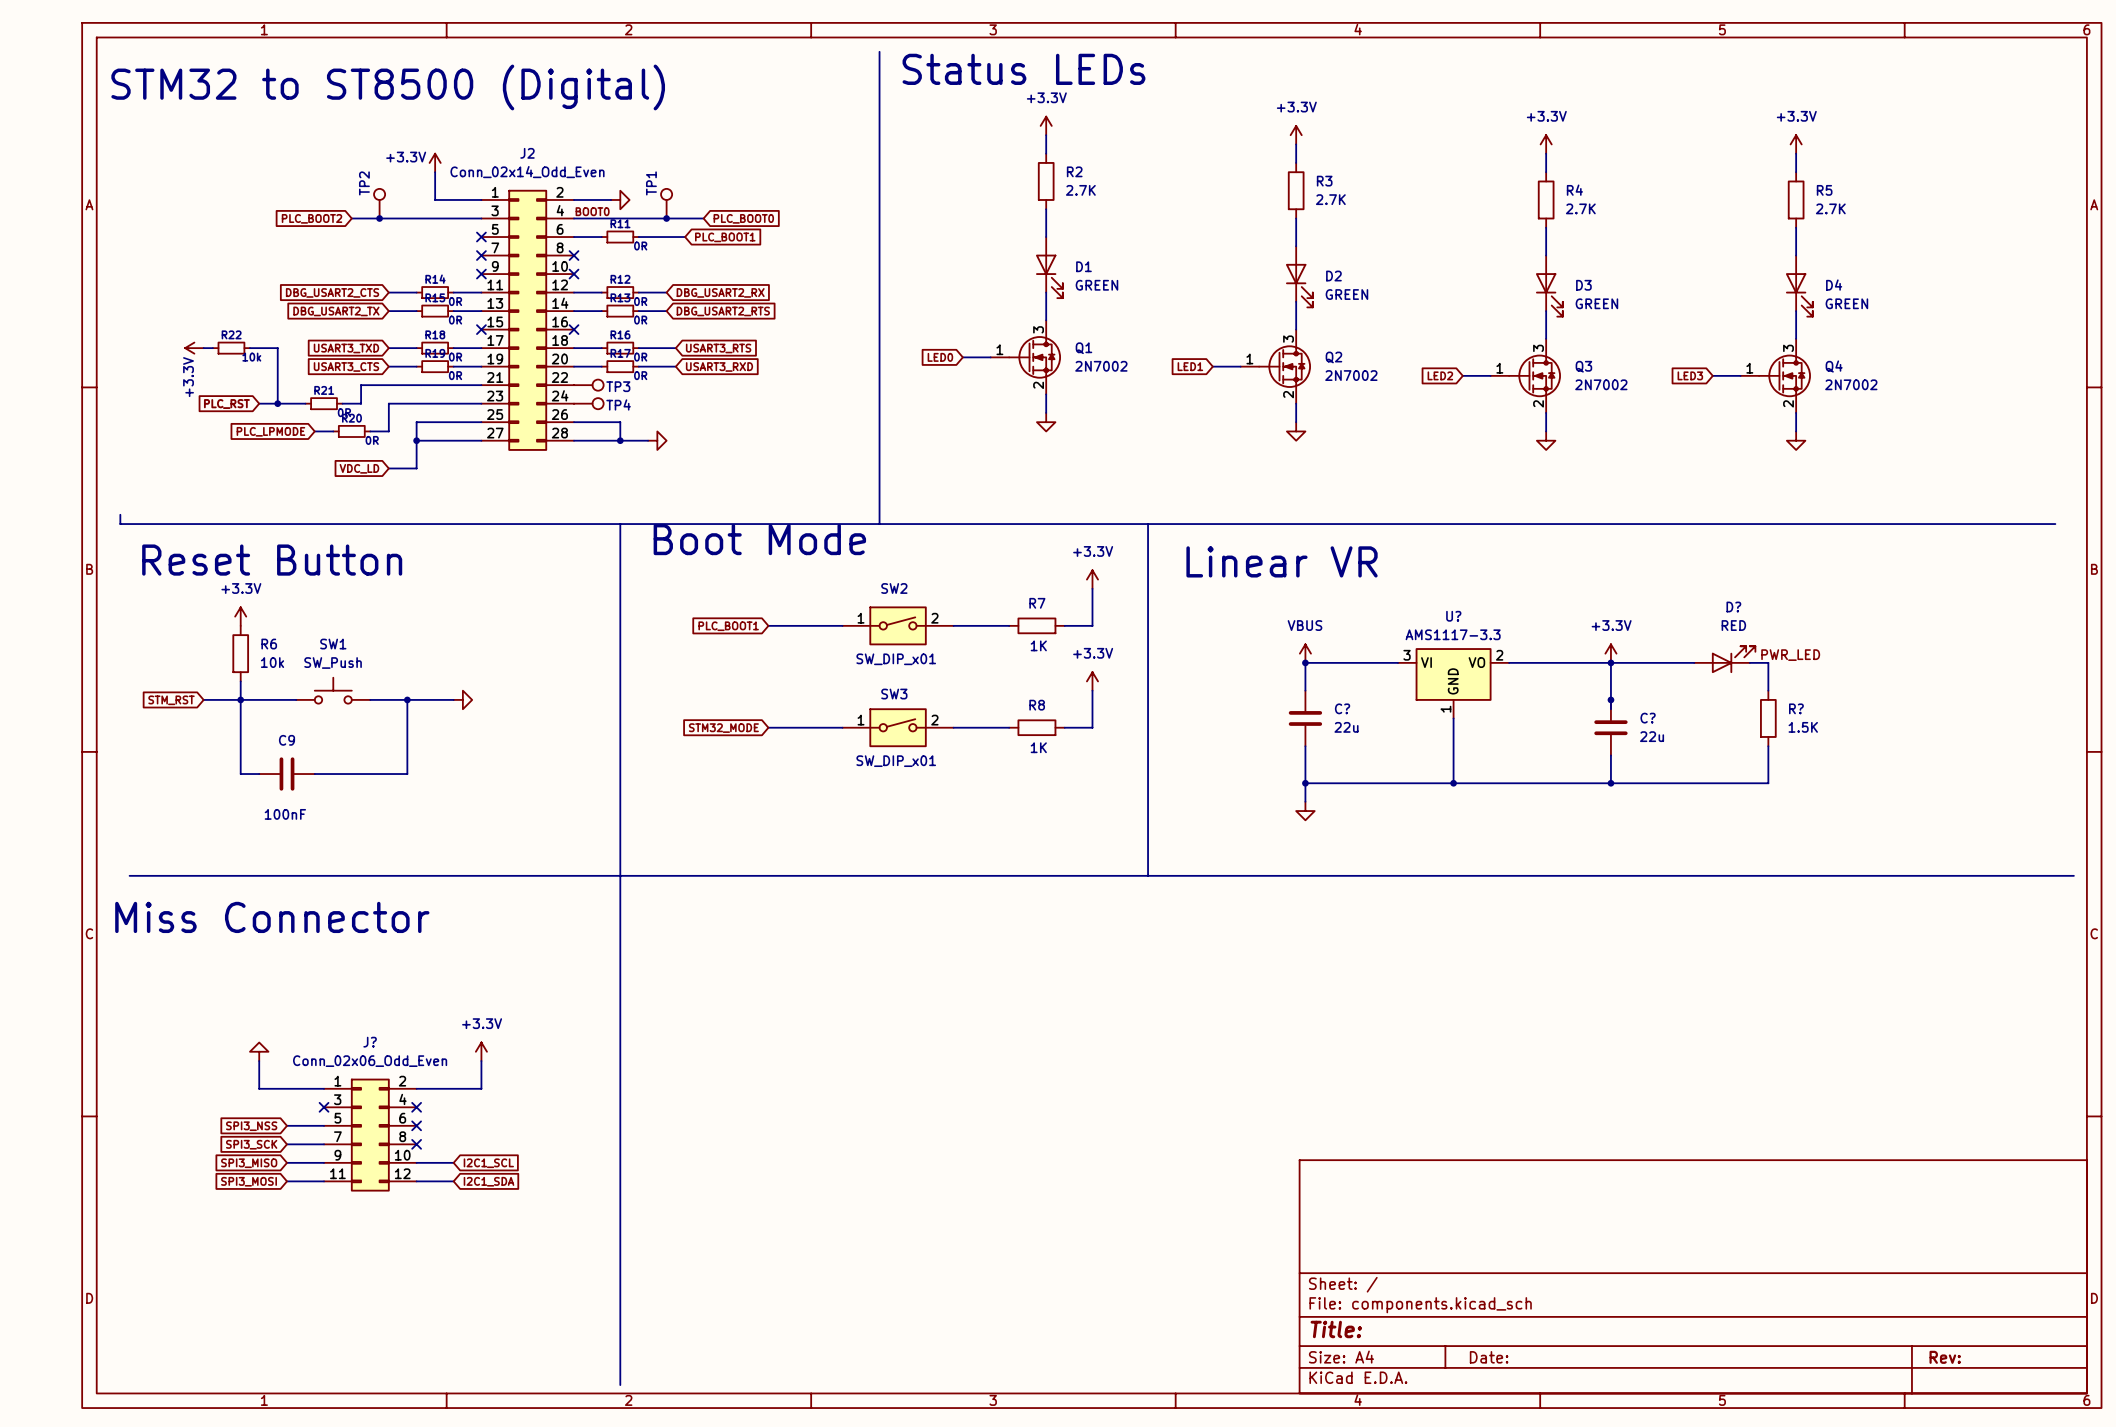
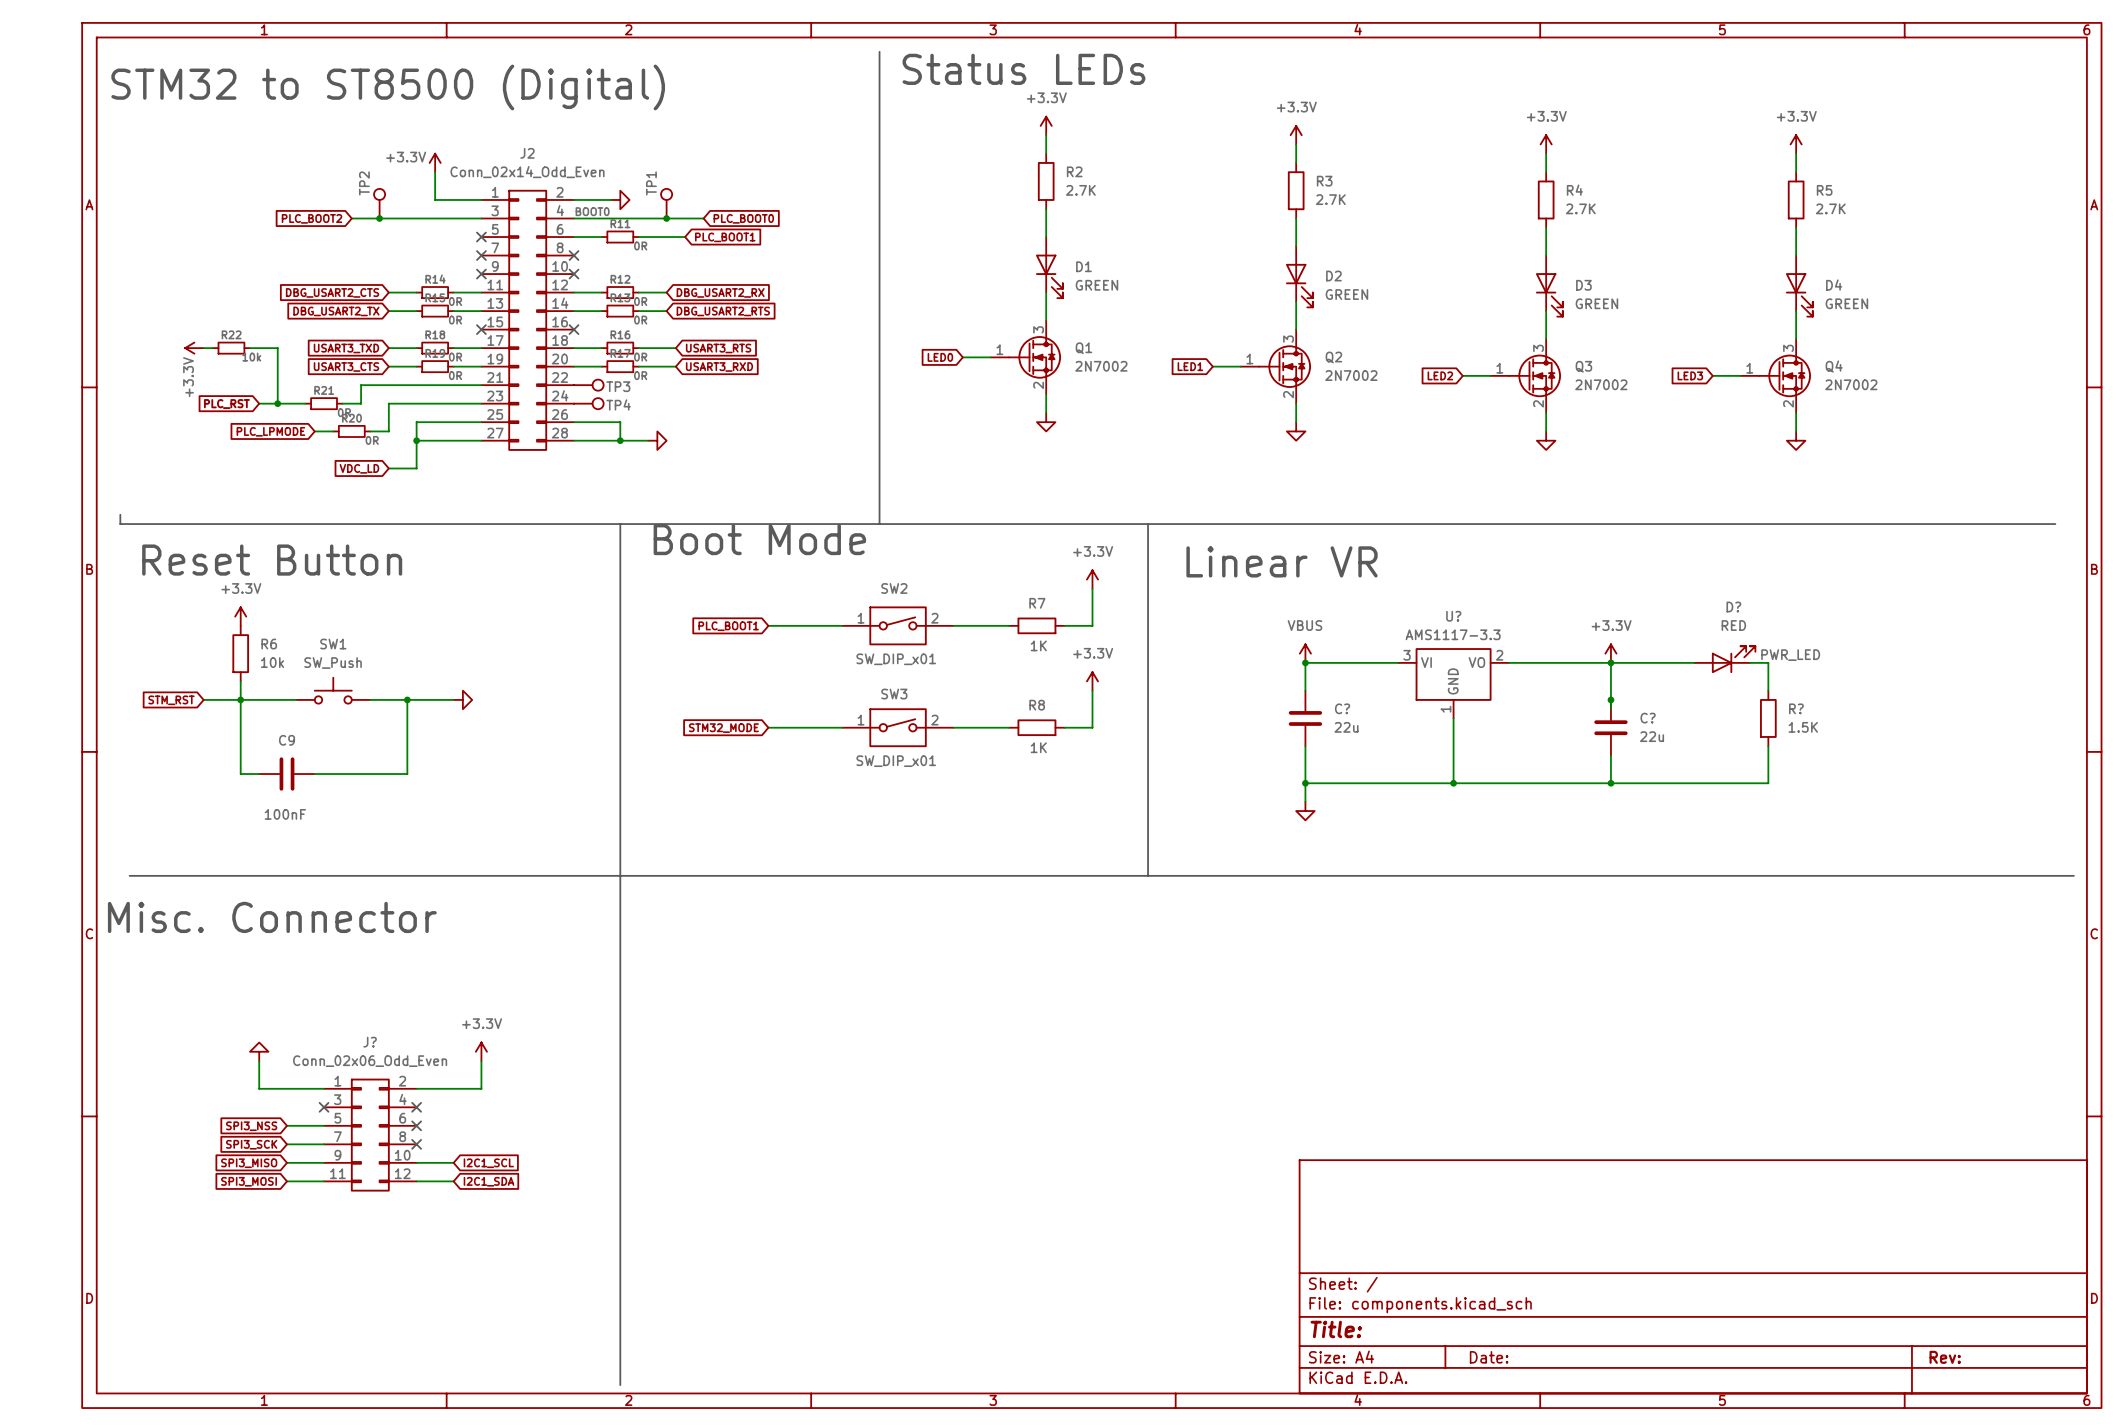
text: Miss Connector (272, 917) -> Misc. Connector (272, 917)

